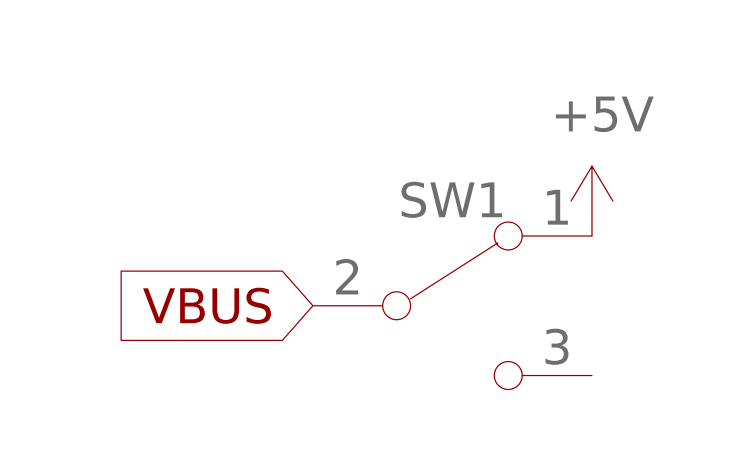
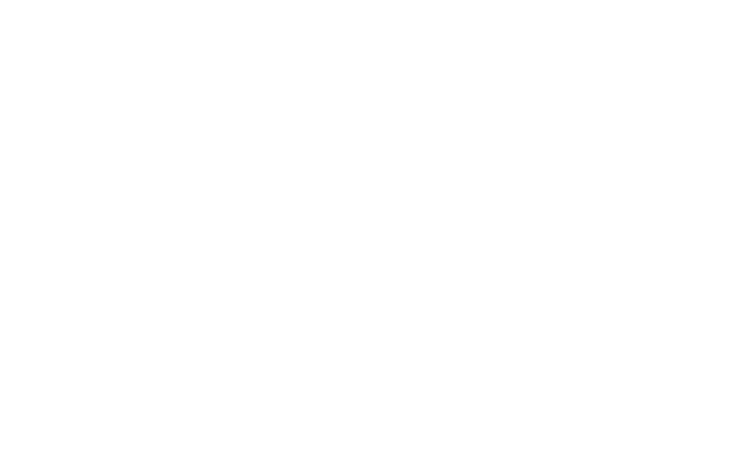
power symbol: +5V (591, 201) -> none
global label: VBUS (207, 305) -> none
SW1: (452, 305) -> none

